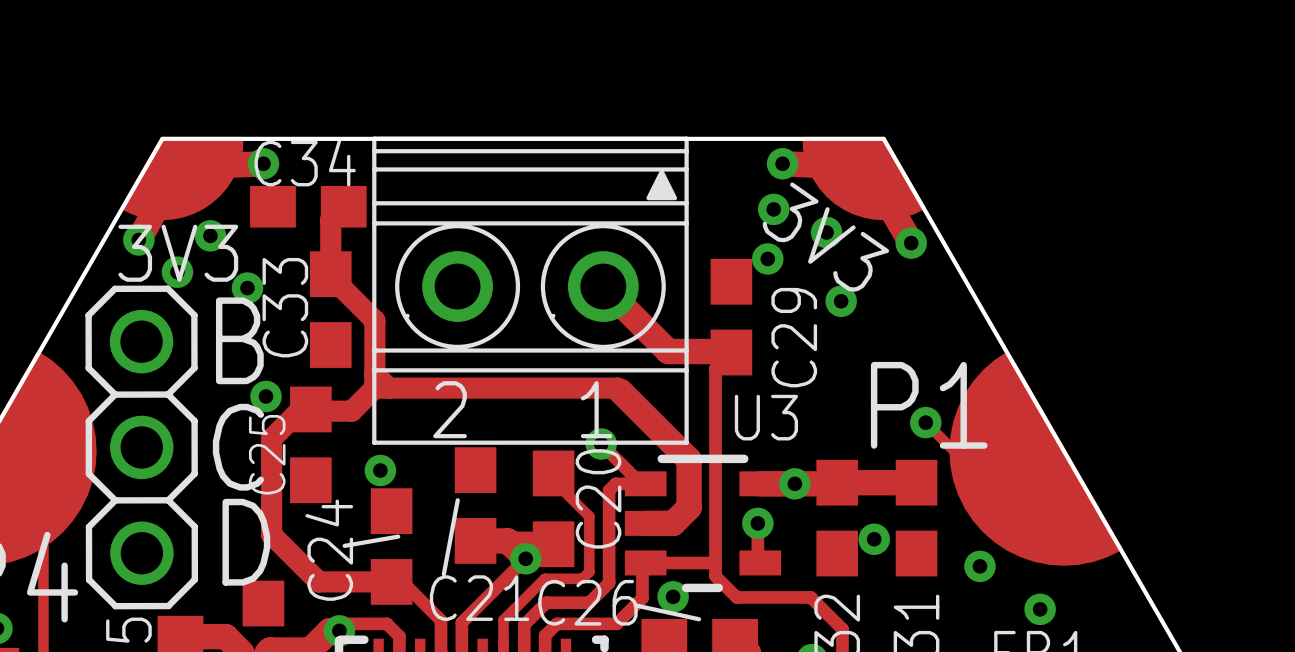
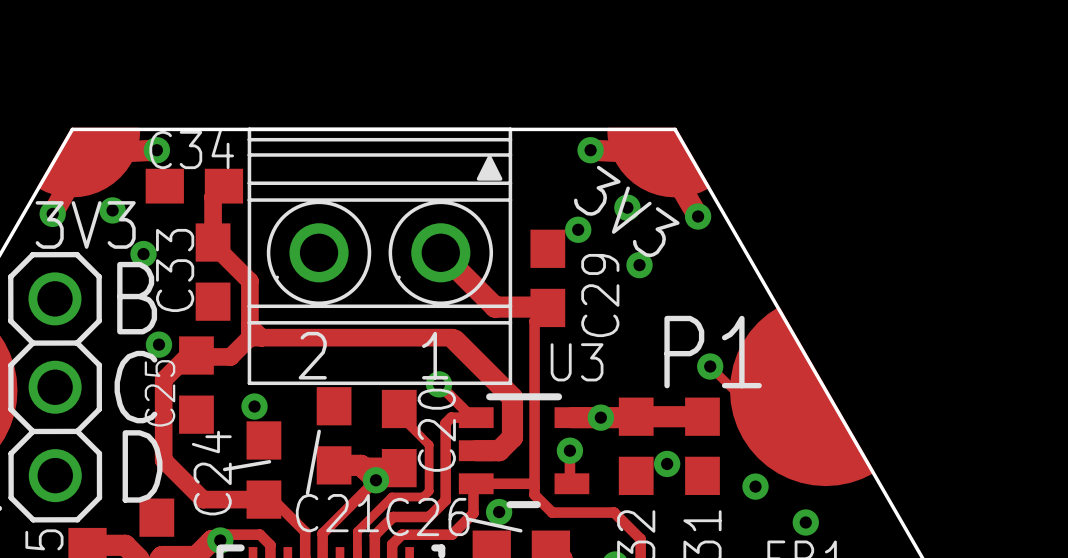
via: (773, 209) -> none
via: (177, 272) -> none

